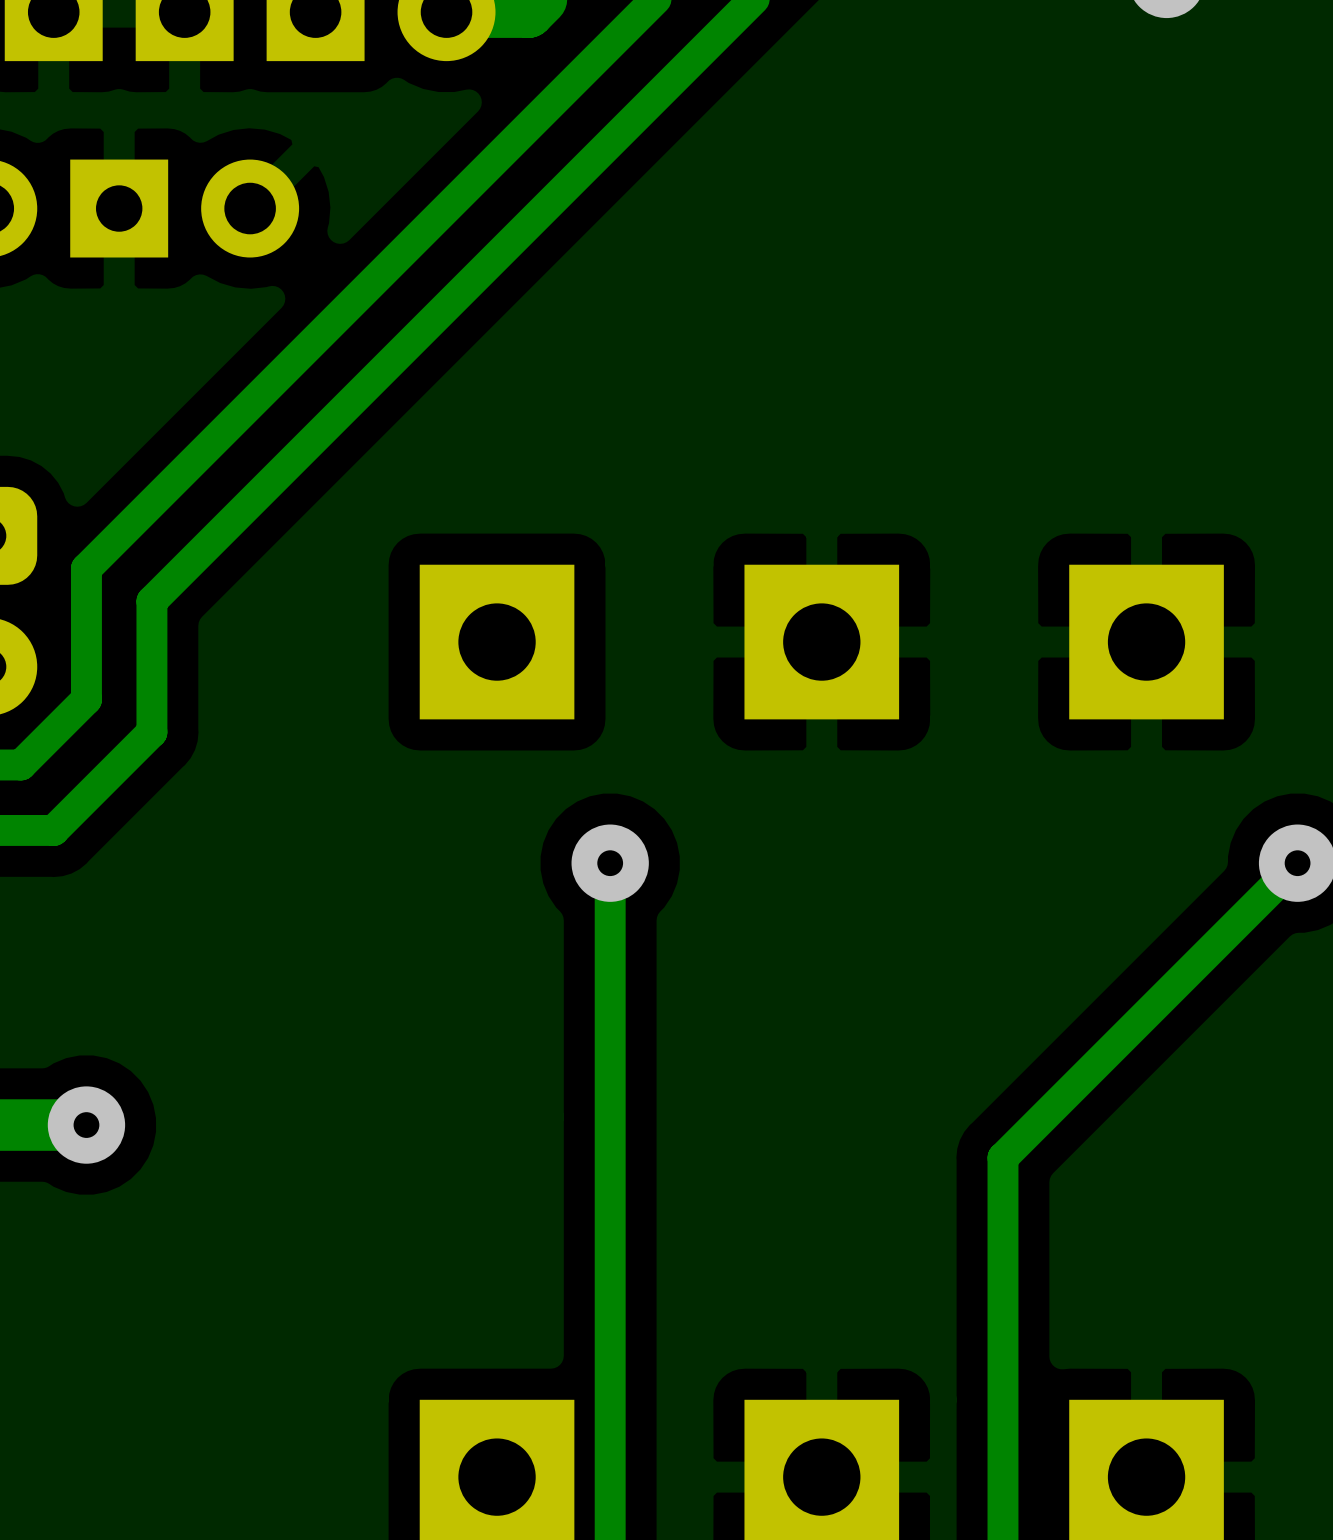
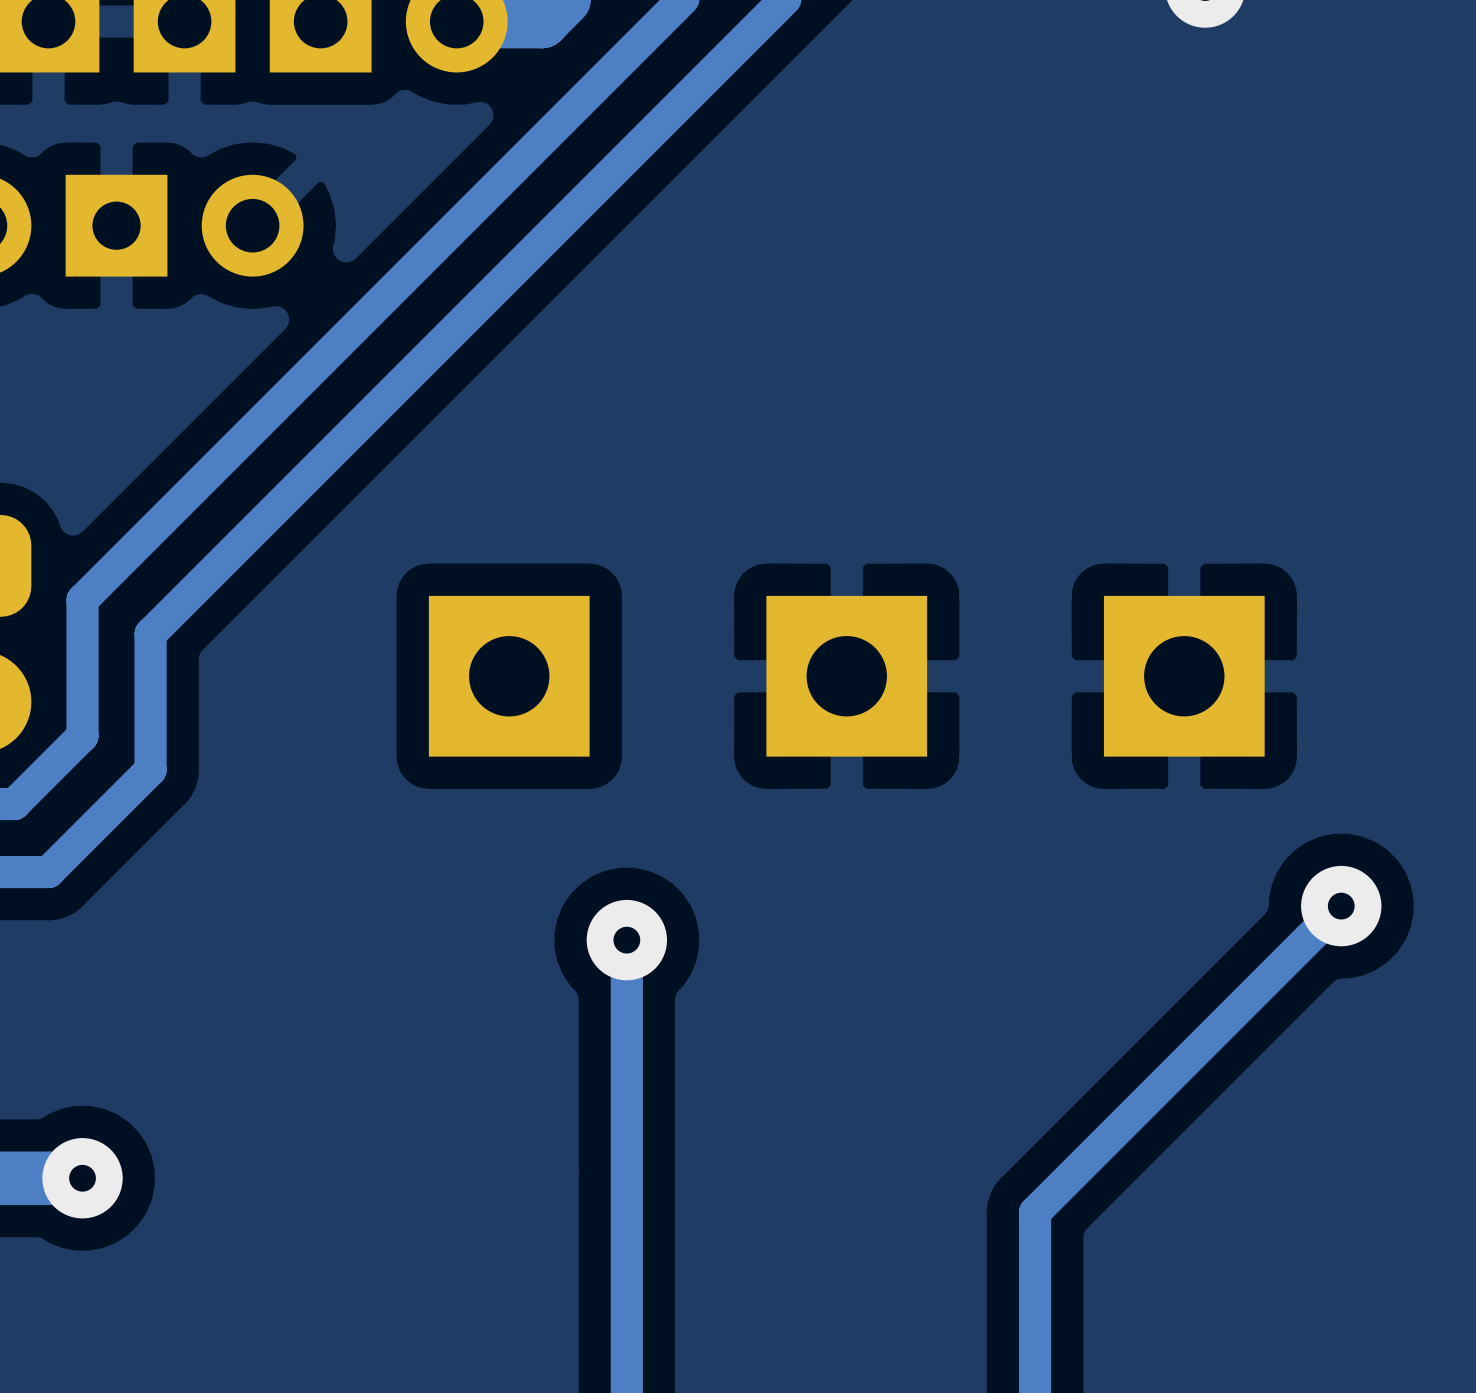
via position: (610, 863) -> (626, 940)

